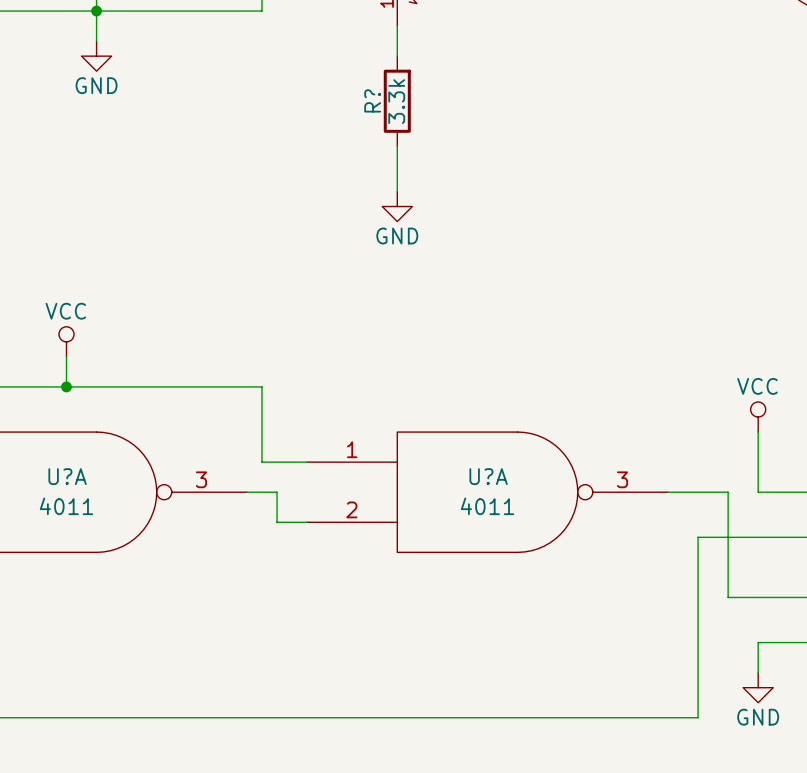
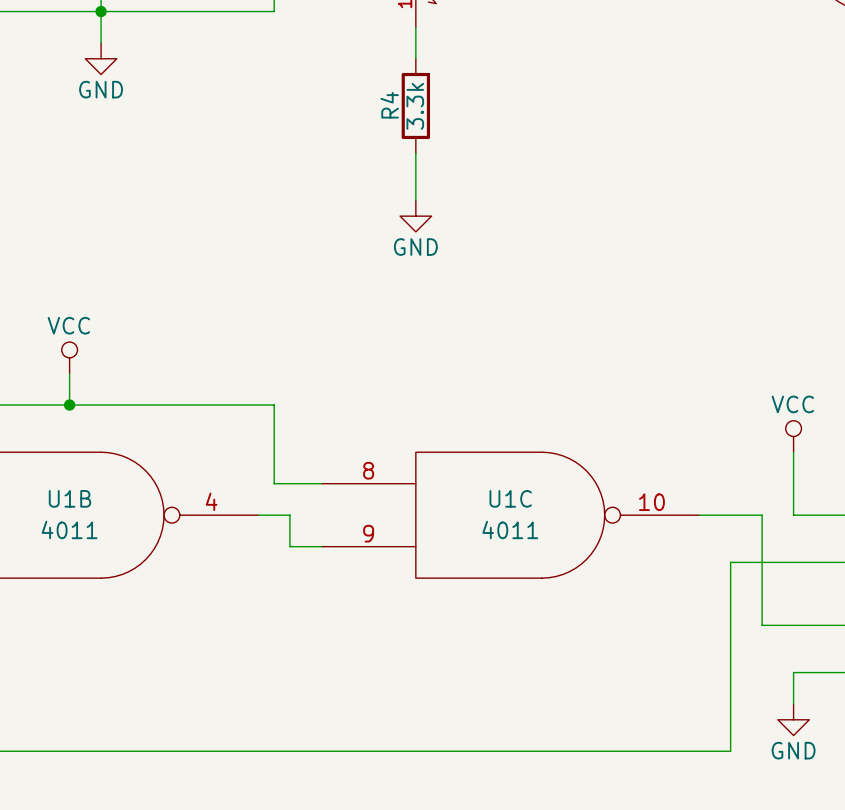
R? name: R? (372, 100) -> R4 (389, 105)
U?A pin number: 1 (352, 449) -> 8 (368, 470)
U?A name: U?A (67, 476) -> U1B (69, 498)
U?A name: U?A (488, 476) -> U1C (510, 498)
U?A pin number: 3 (201, 479) -> 4 (211, 501)
U?A pin number: 3 (622, 479) -> 10 (651, 502)
U?A pin number: 2 (351, 509) -> 9 (368, 533)

